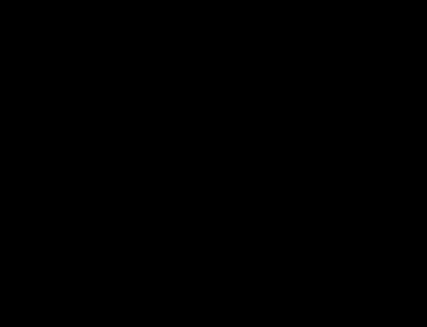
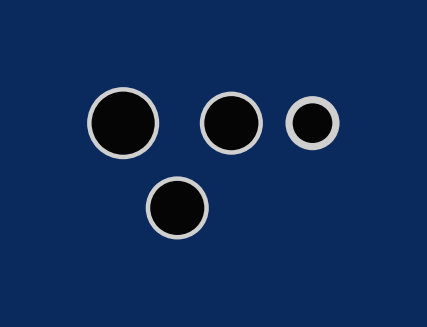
part: none -> (213, 163)

